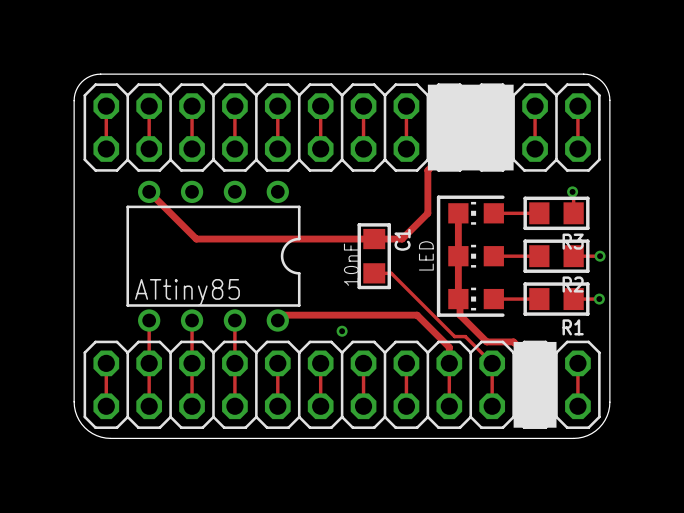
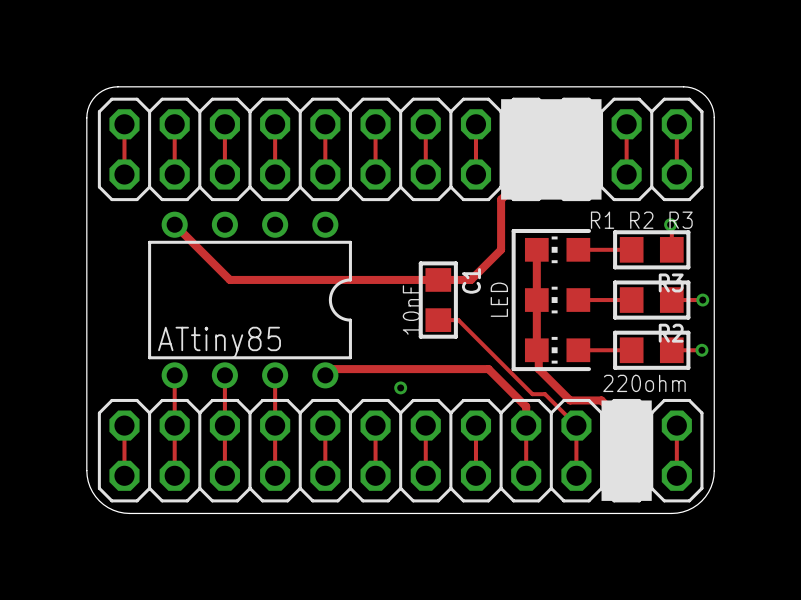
text: none -> R1 R2 R3 (641, 220)
text: none -> 220ohm (644, 383)
R1 name: R1 (573, 327) -> none

